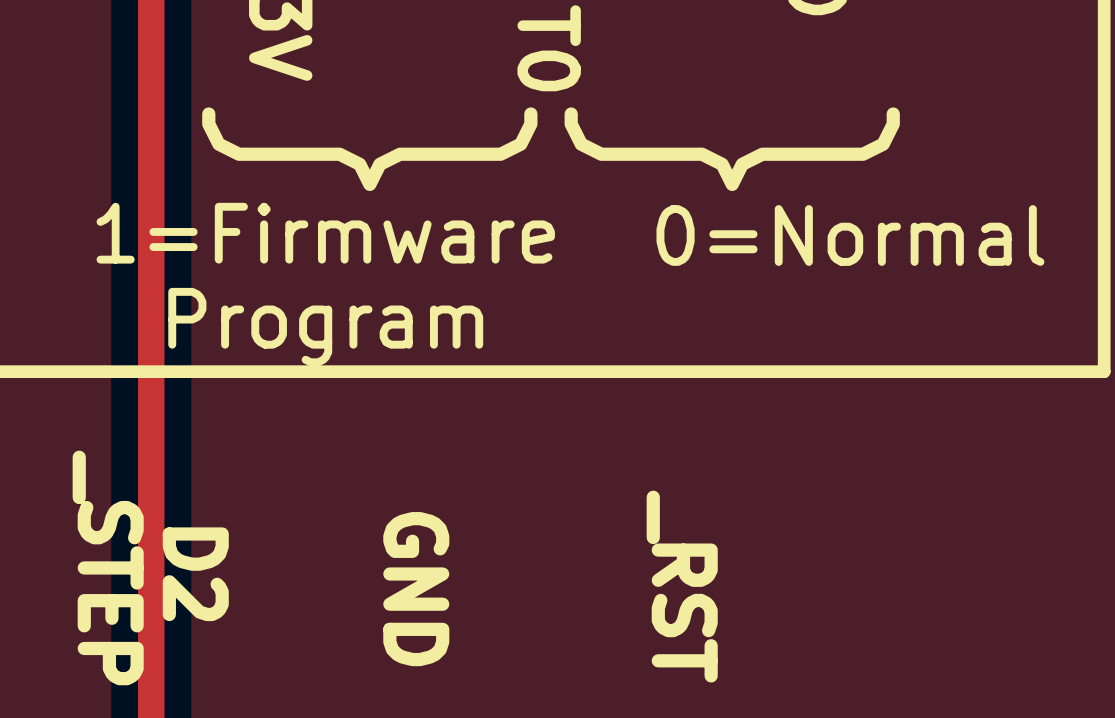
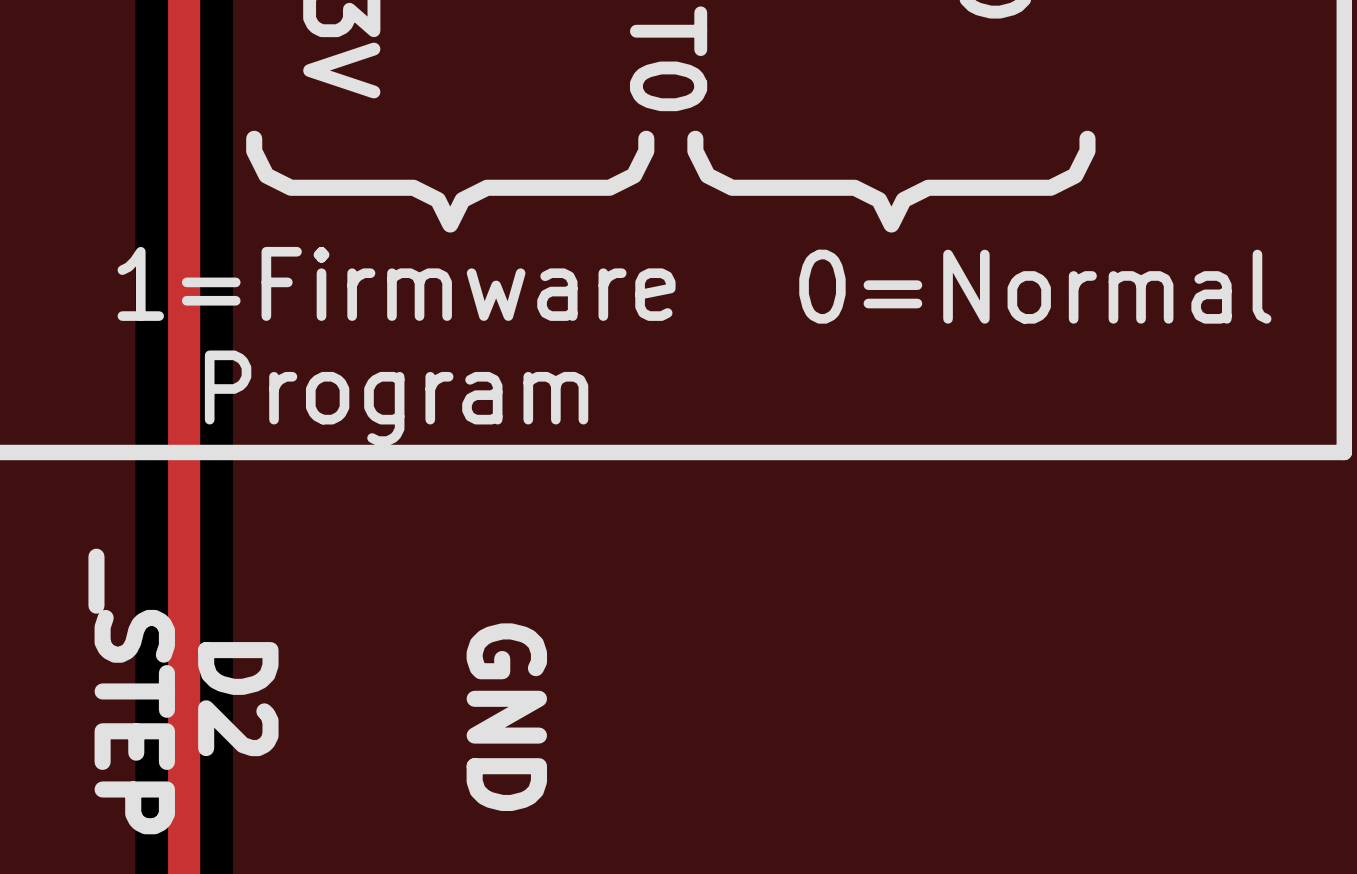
text: _RST (682, 586) -> none

